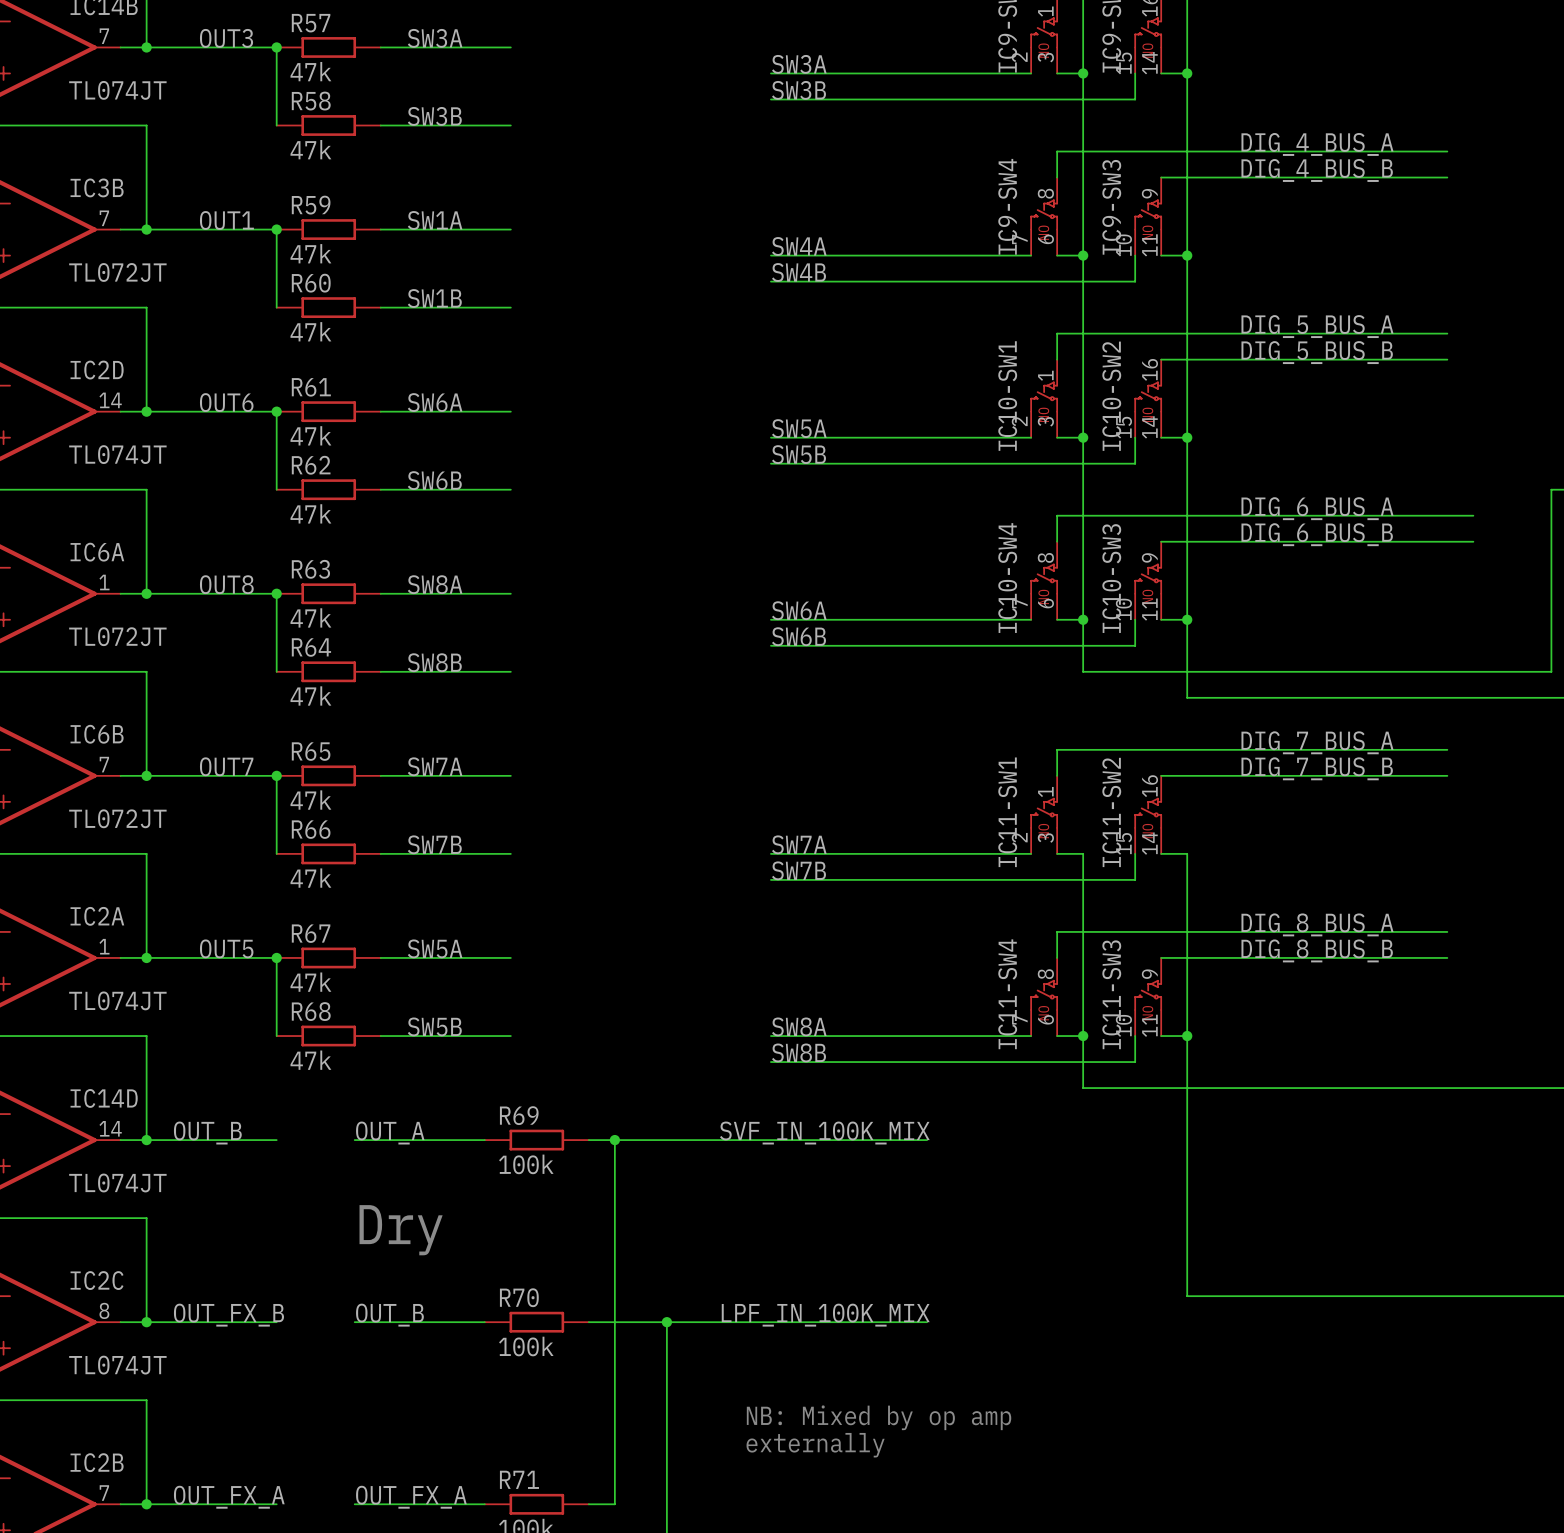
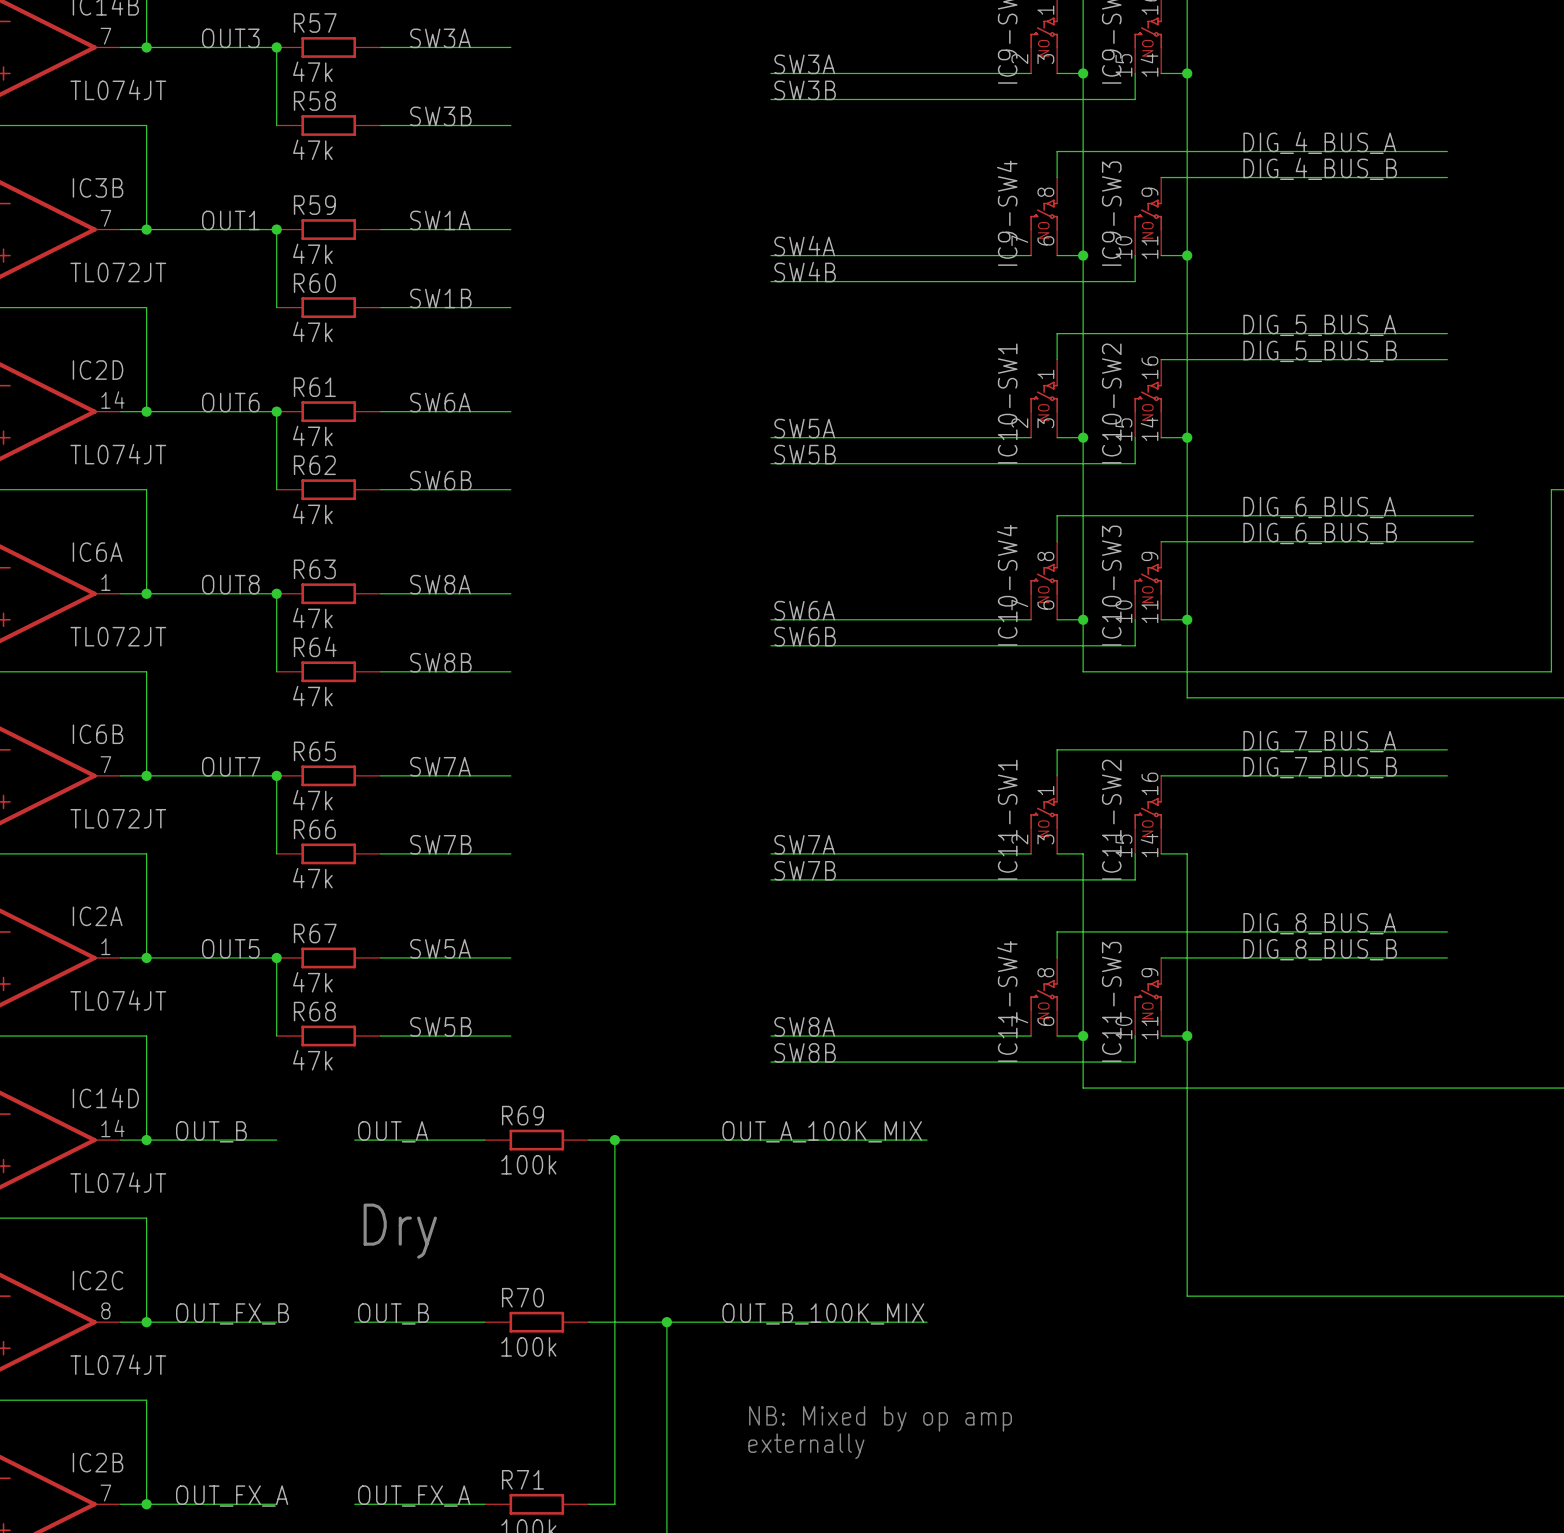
label: SVF_IN_100K_MIX (824, 1133) -> OUT_A_100K_MIX (822, 1131)
label: LPF_IN_100K_MIX (825, 1315) -> OUT_B_100K_MIX (823, 1313)

